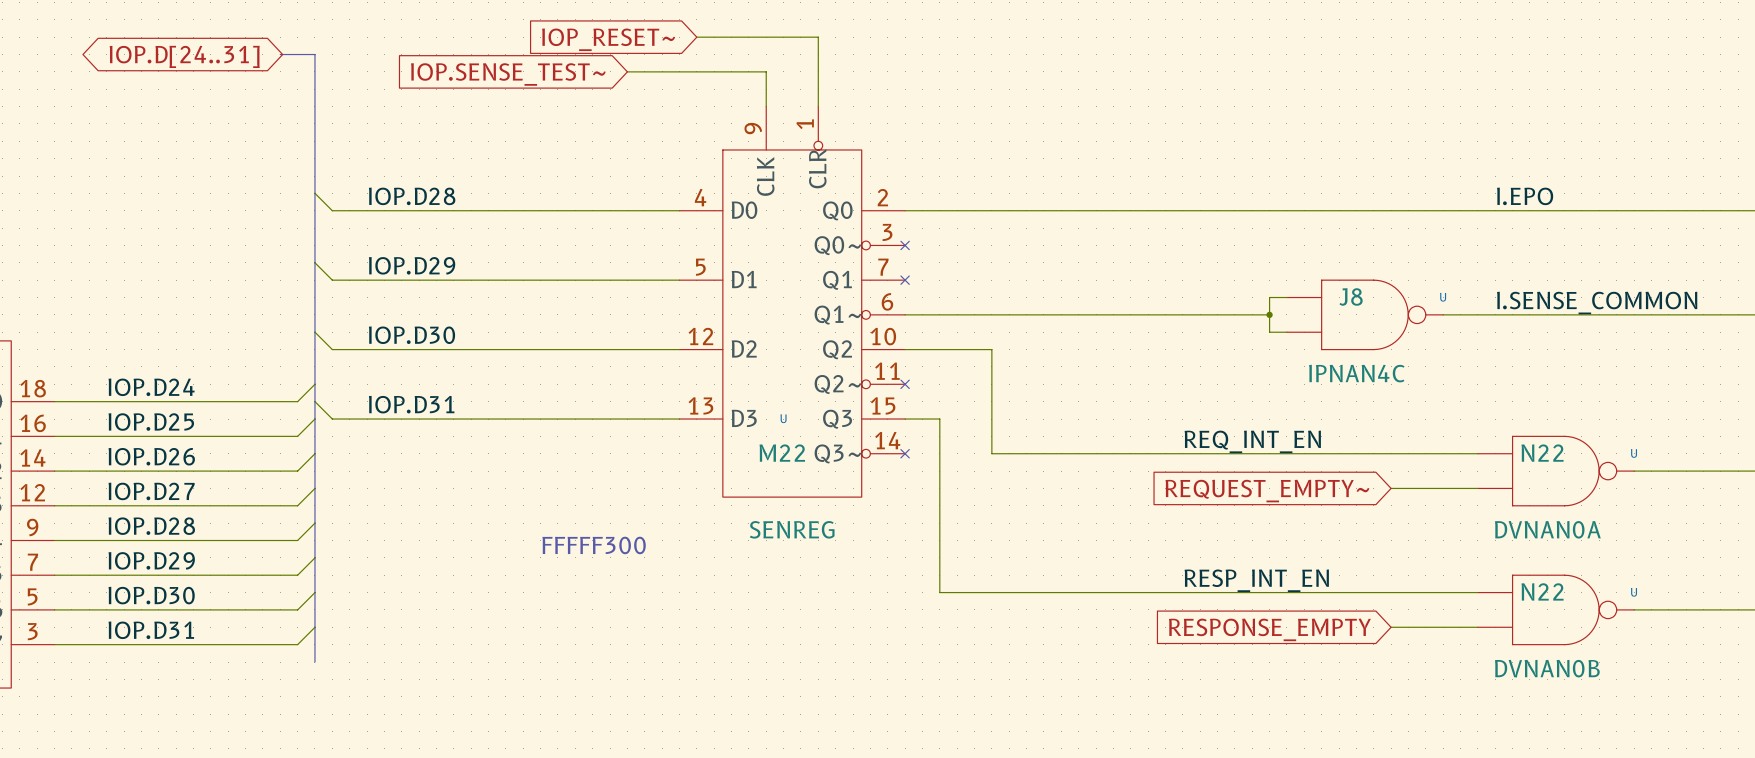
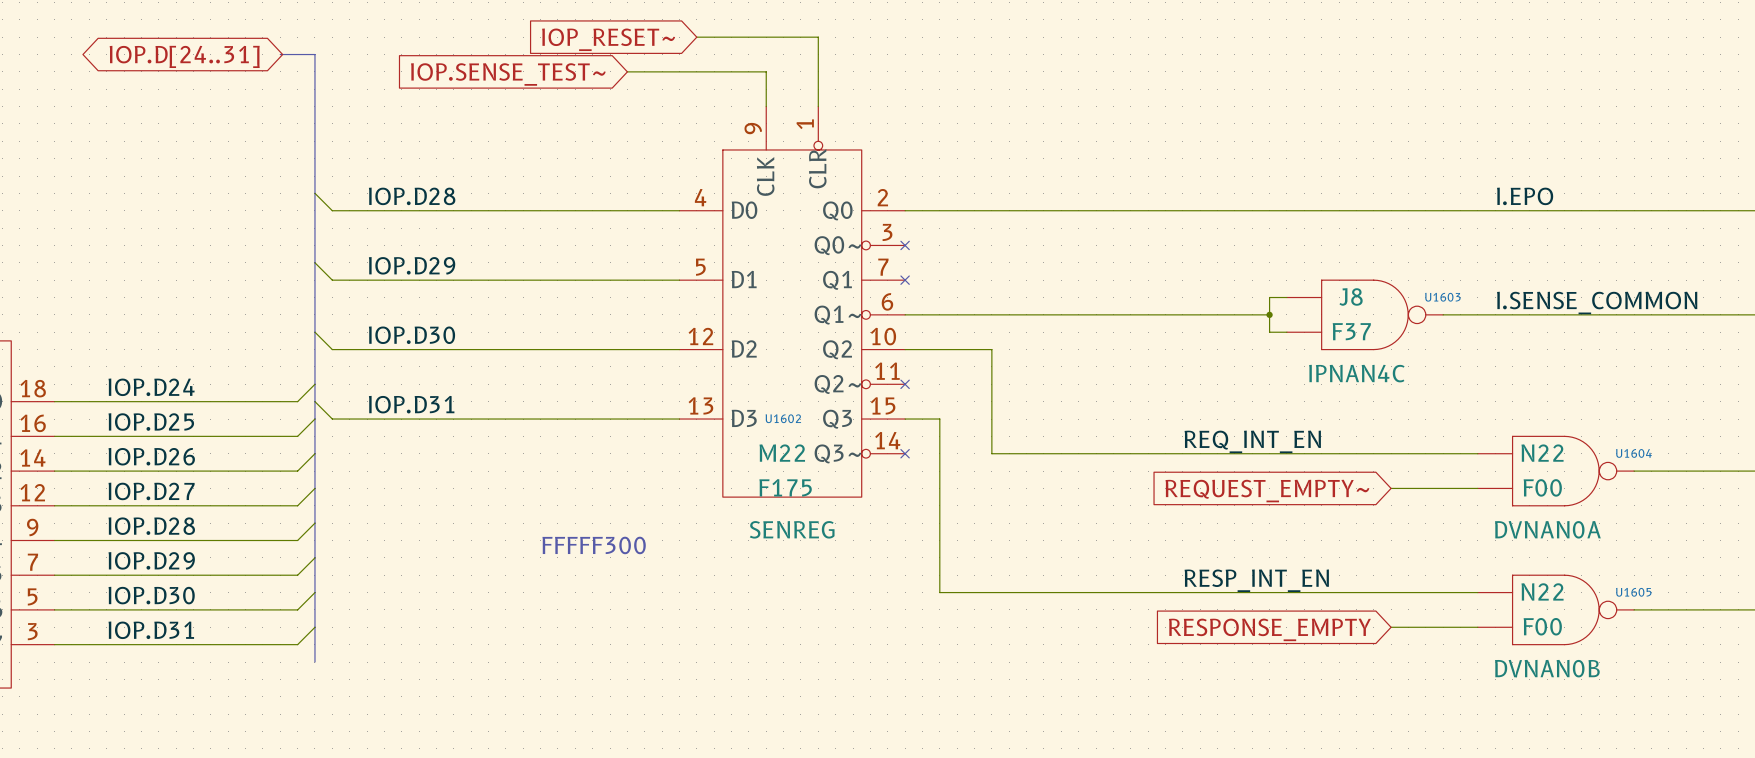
U name: U (1443, 297) -> U1603 (1442, 297)
U value: none -> F37 (1351, 331)
U name: U (783, 418) -> U1602 (783, 418)
U name: U (1633, 453) -> U1604 (1633, 453)
U value: none -> F175 (785, 487)
U value: none -> F00 (1542, 487)
U name: U (1633, 592) -> U1605 (1633, 592)
U value: none -> F00 (1542, 626)

